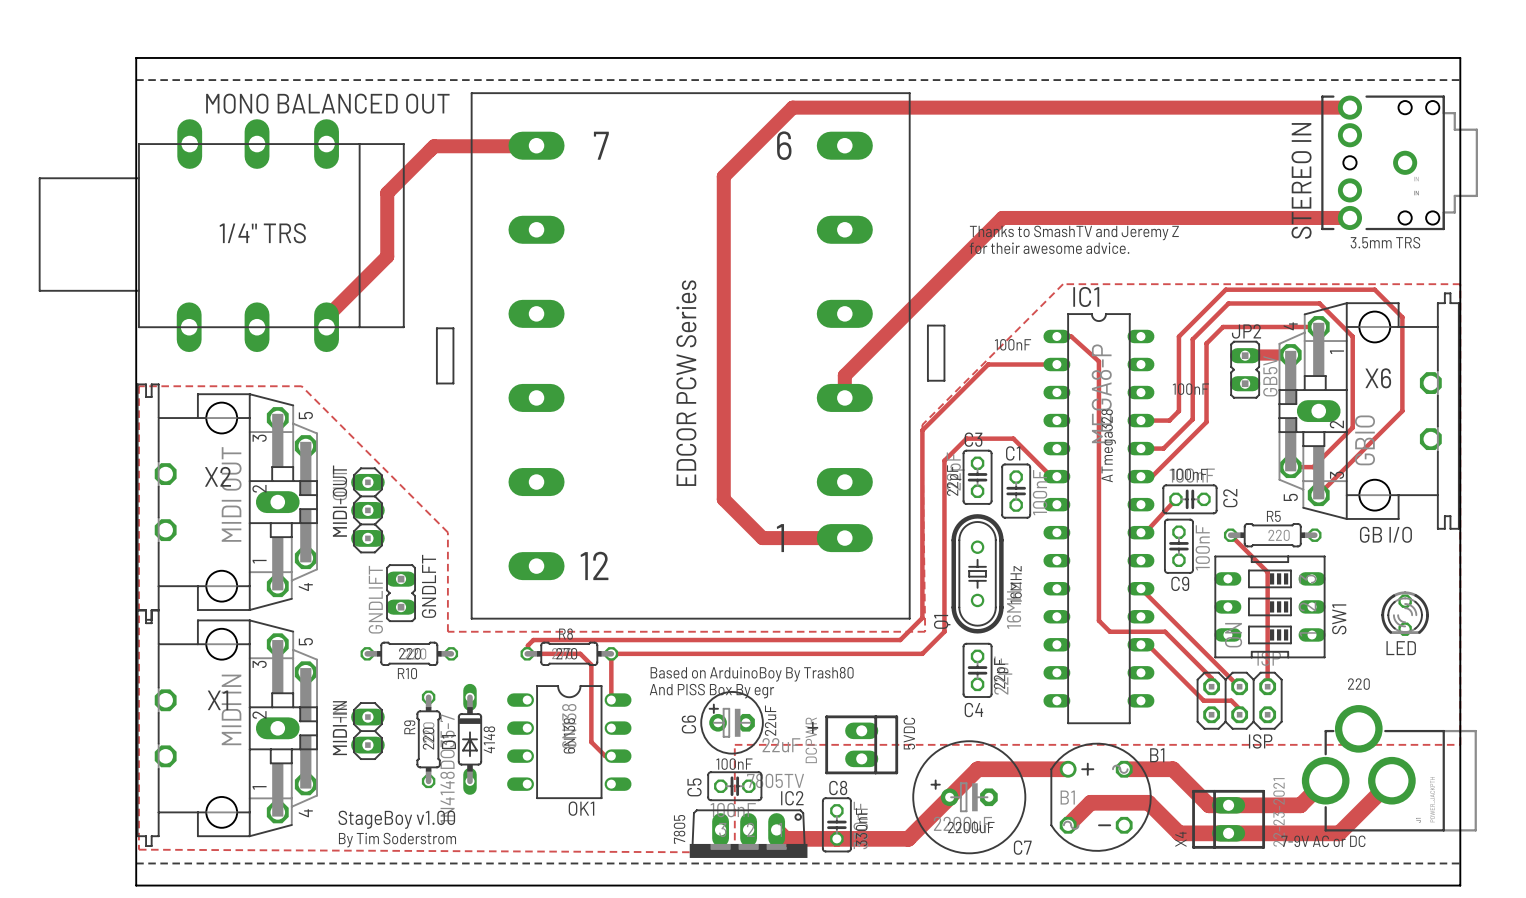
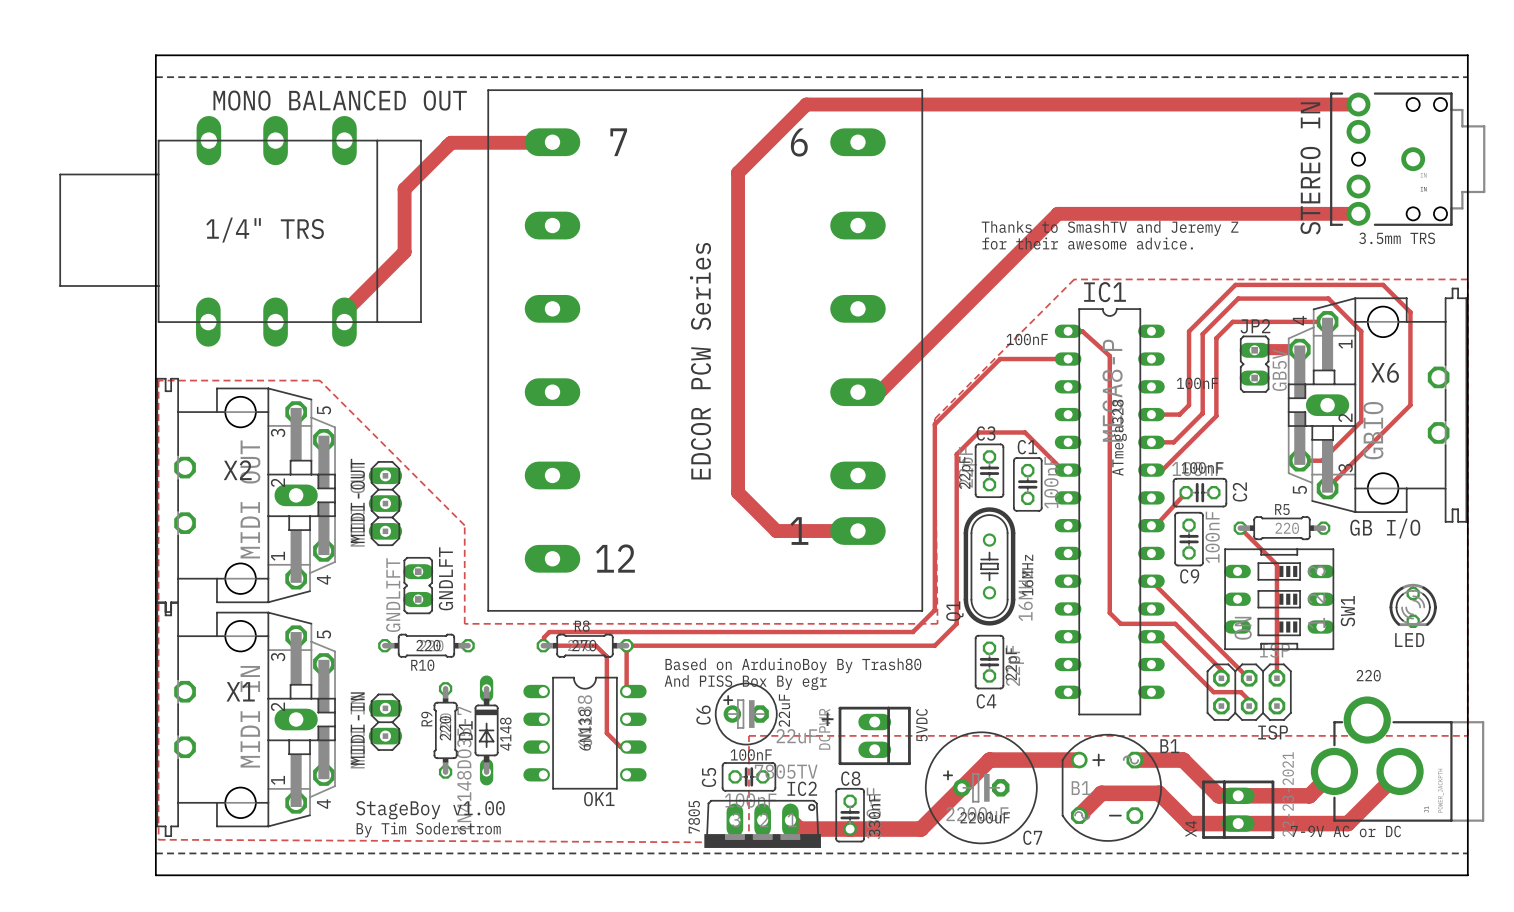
track: (1046, 217) (1002, 217) (844, 375) (844, 397) -> (1057, 213) (880, 391) (857, 392)
line: (927, 325) (927, 380) (944, 380) (944, 325) (927, 325) -> none
line: (436, 328) (436, 383) (453, 383) (453, 328) (436, 328) -> none

